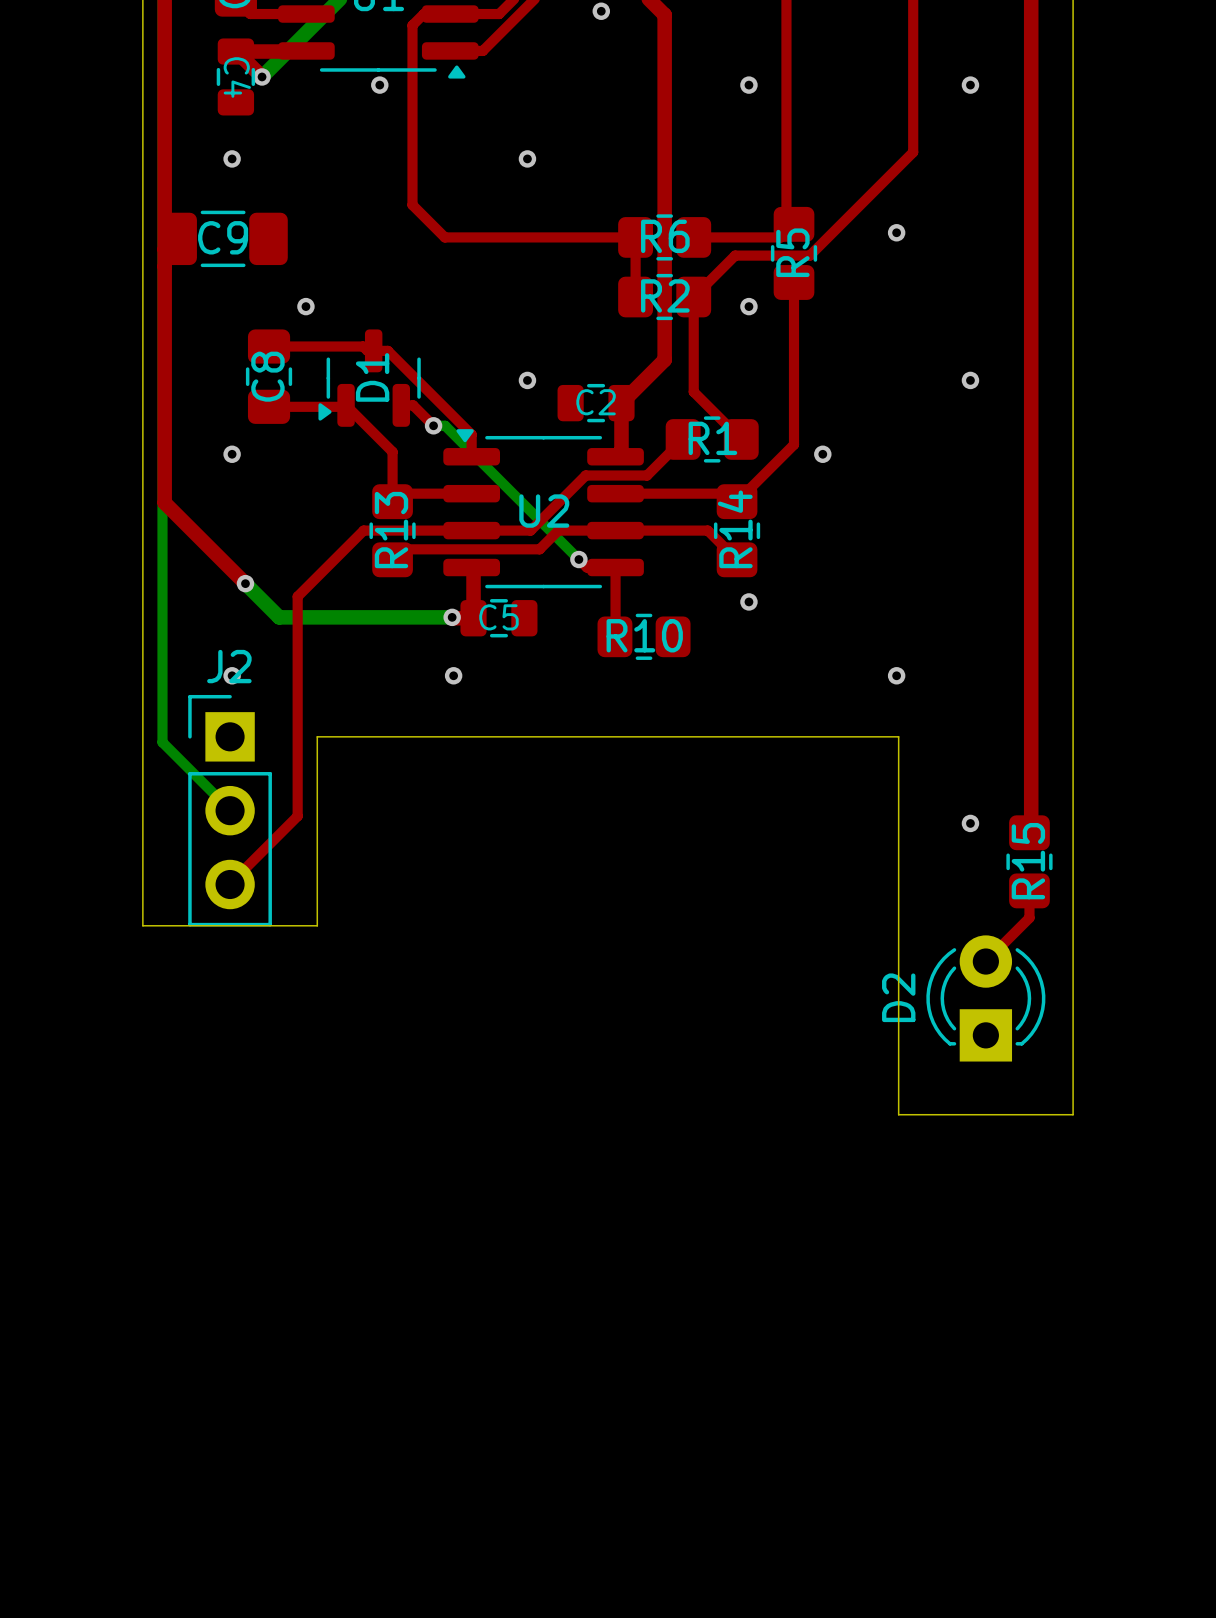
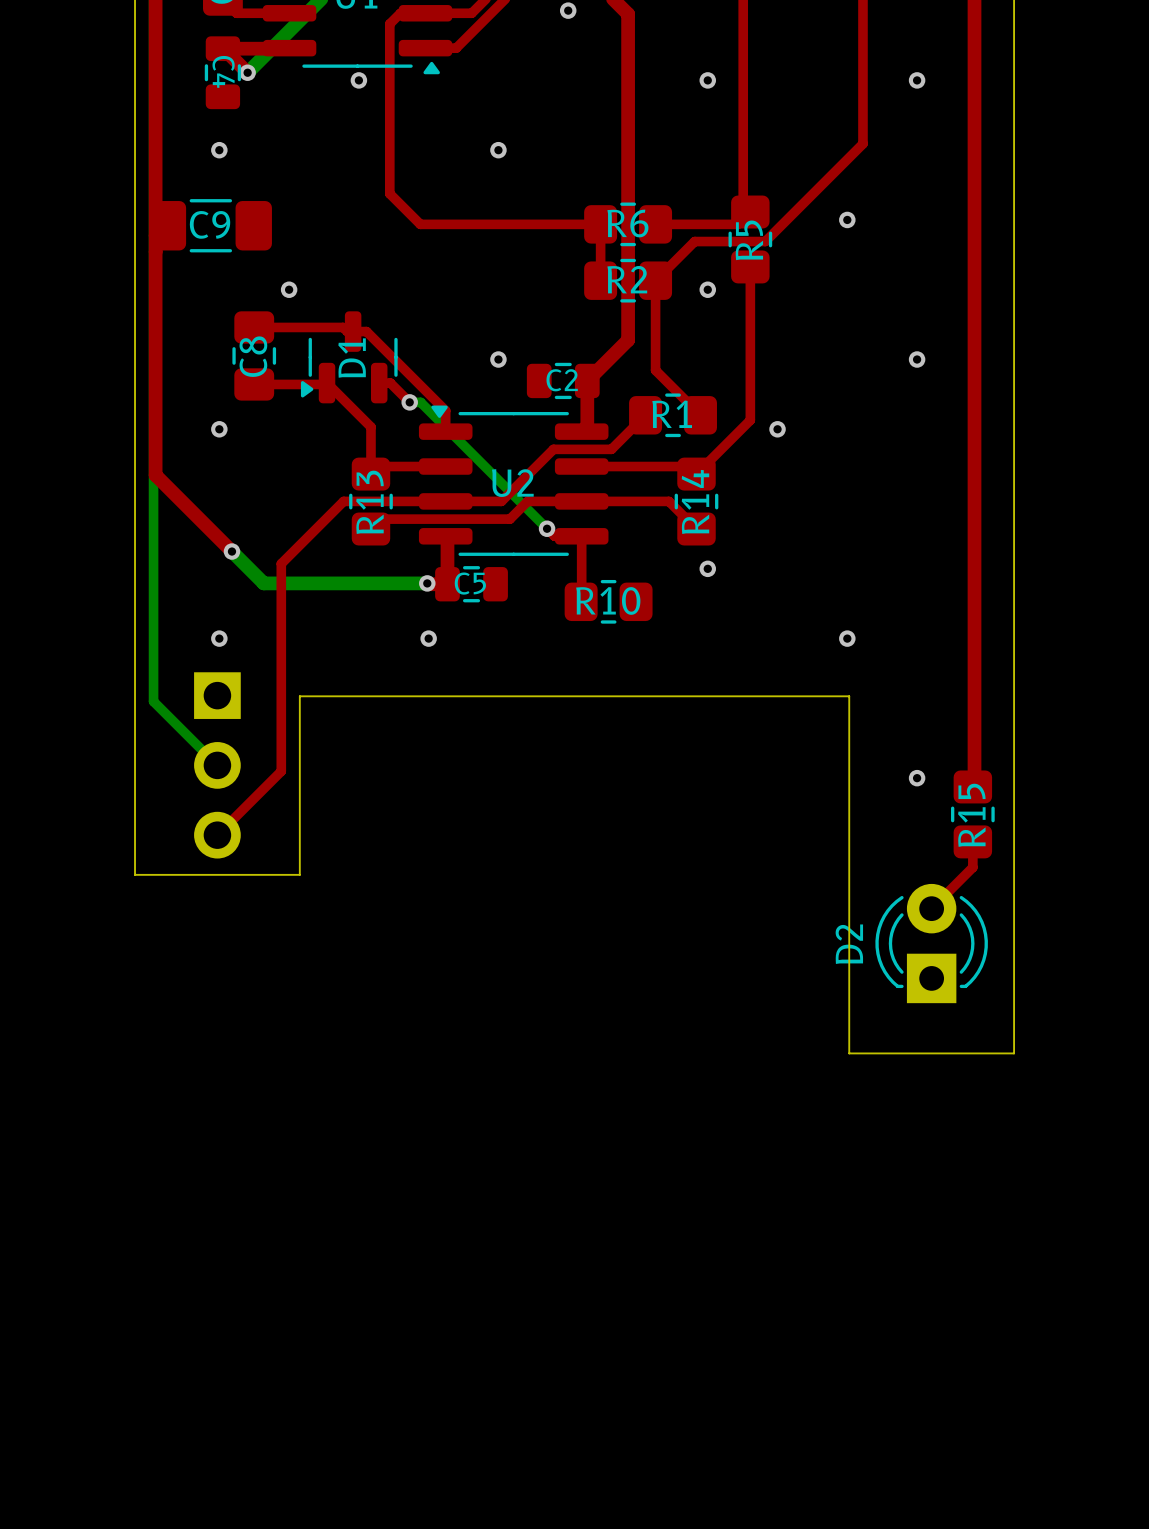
part: none -> (217, 765)
J2: (230, 810) -> none

